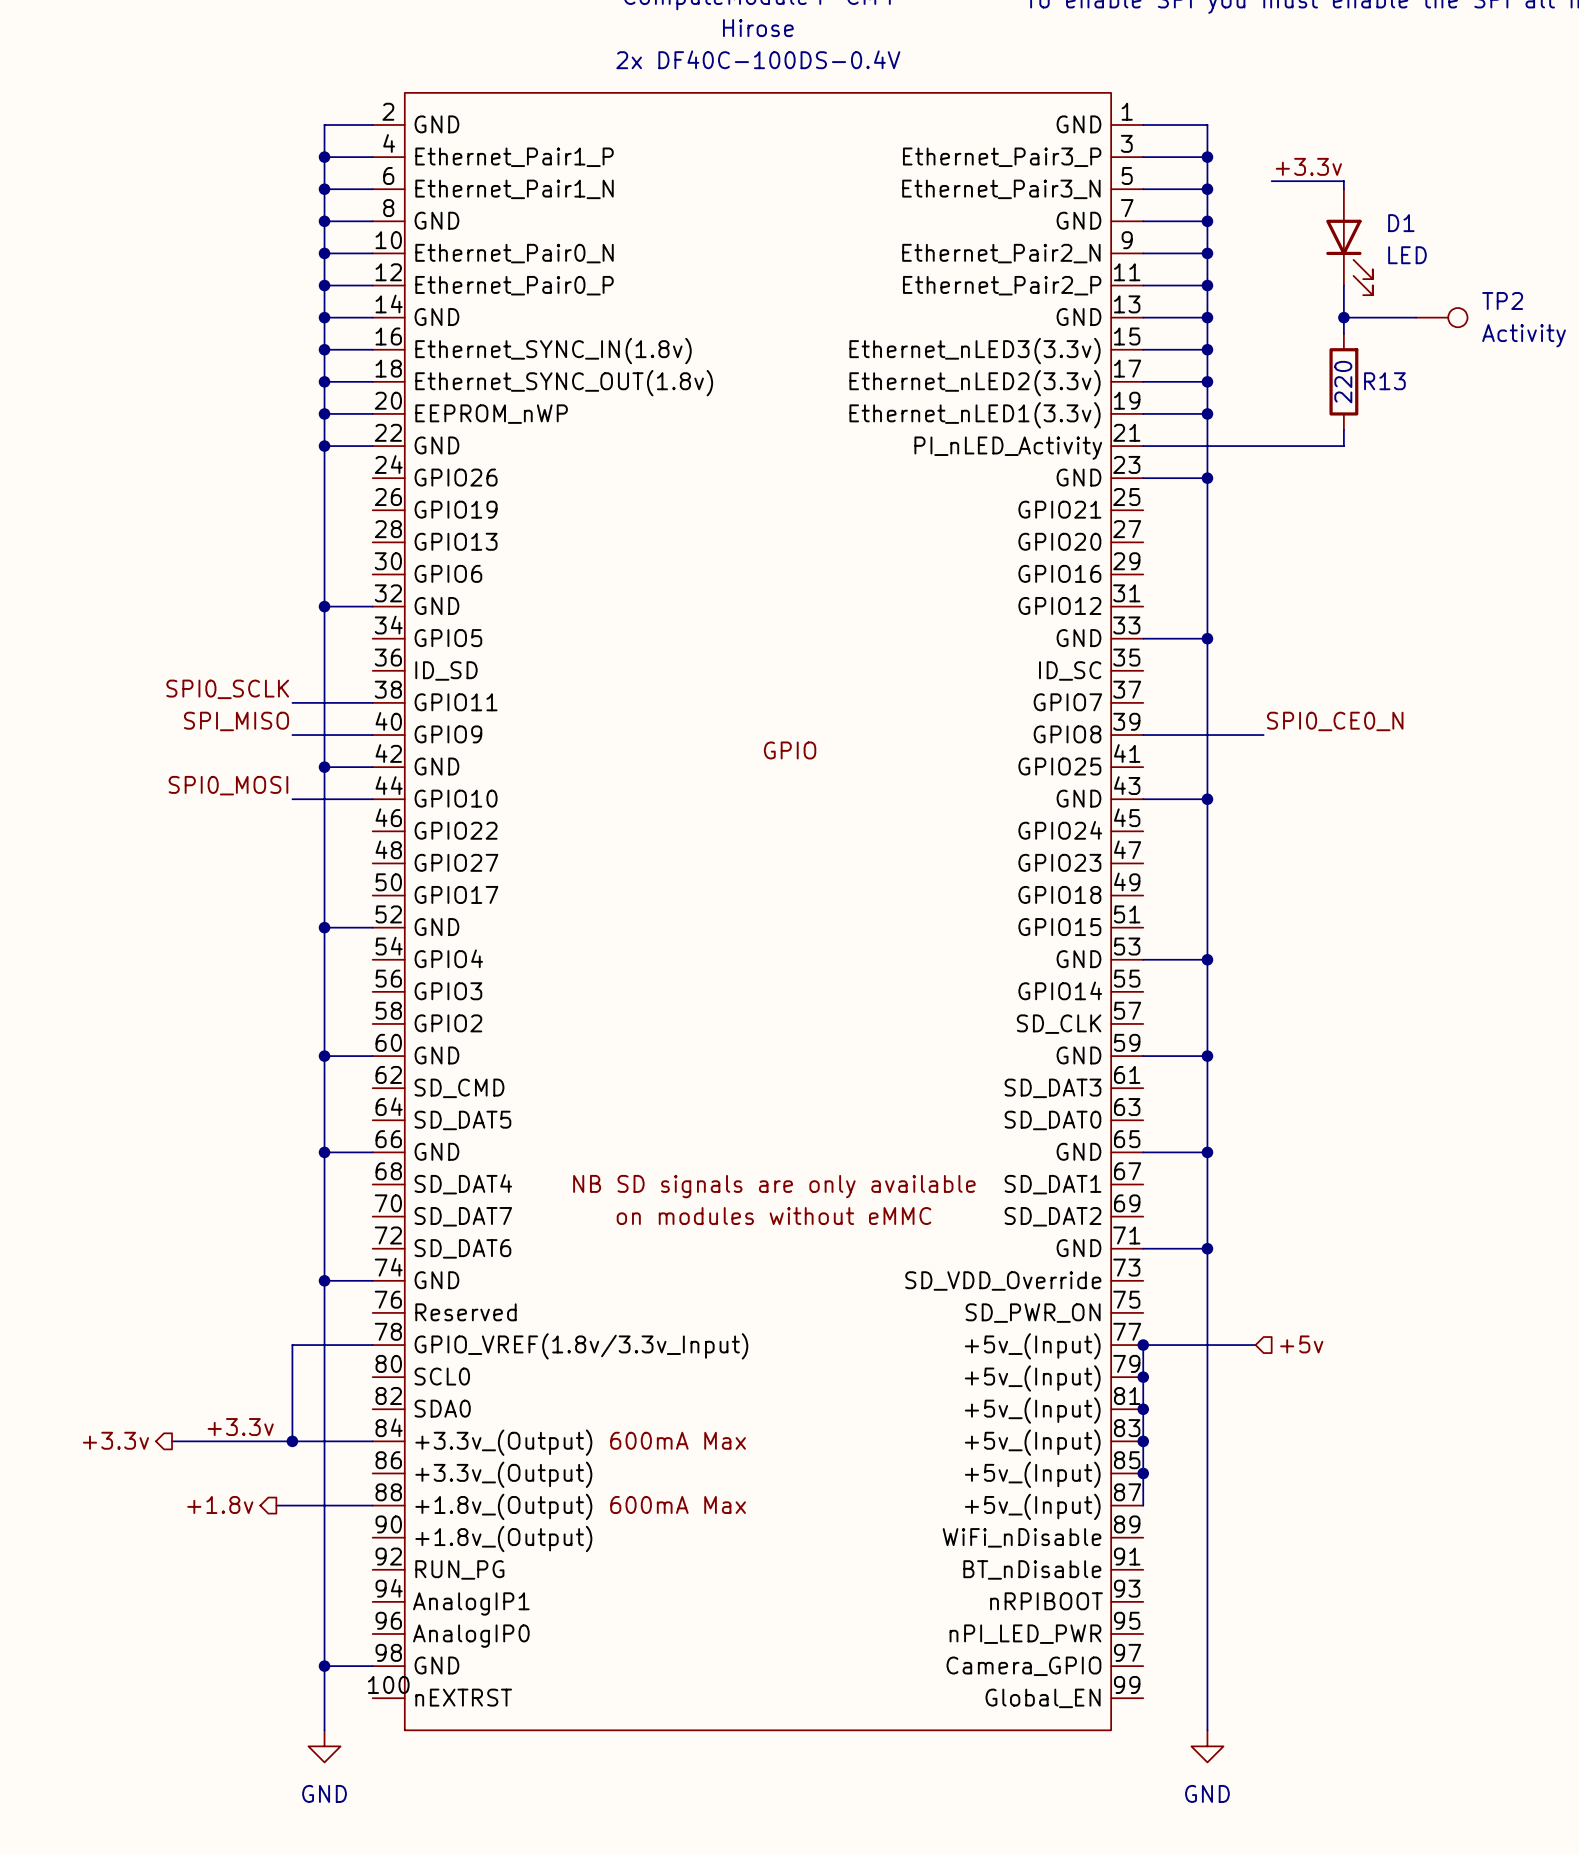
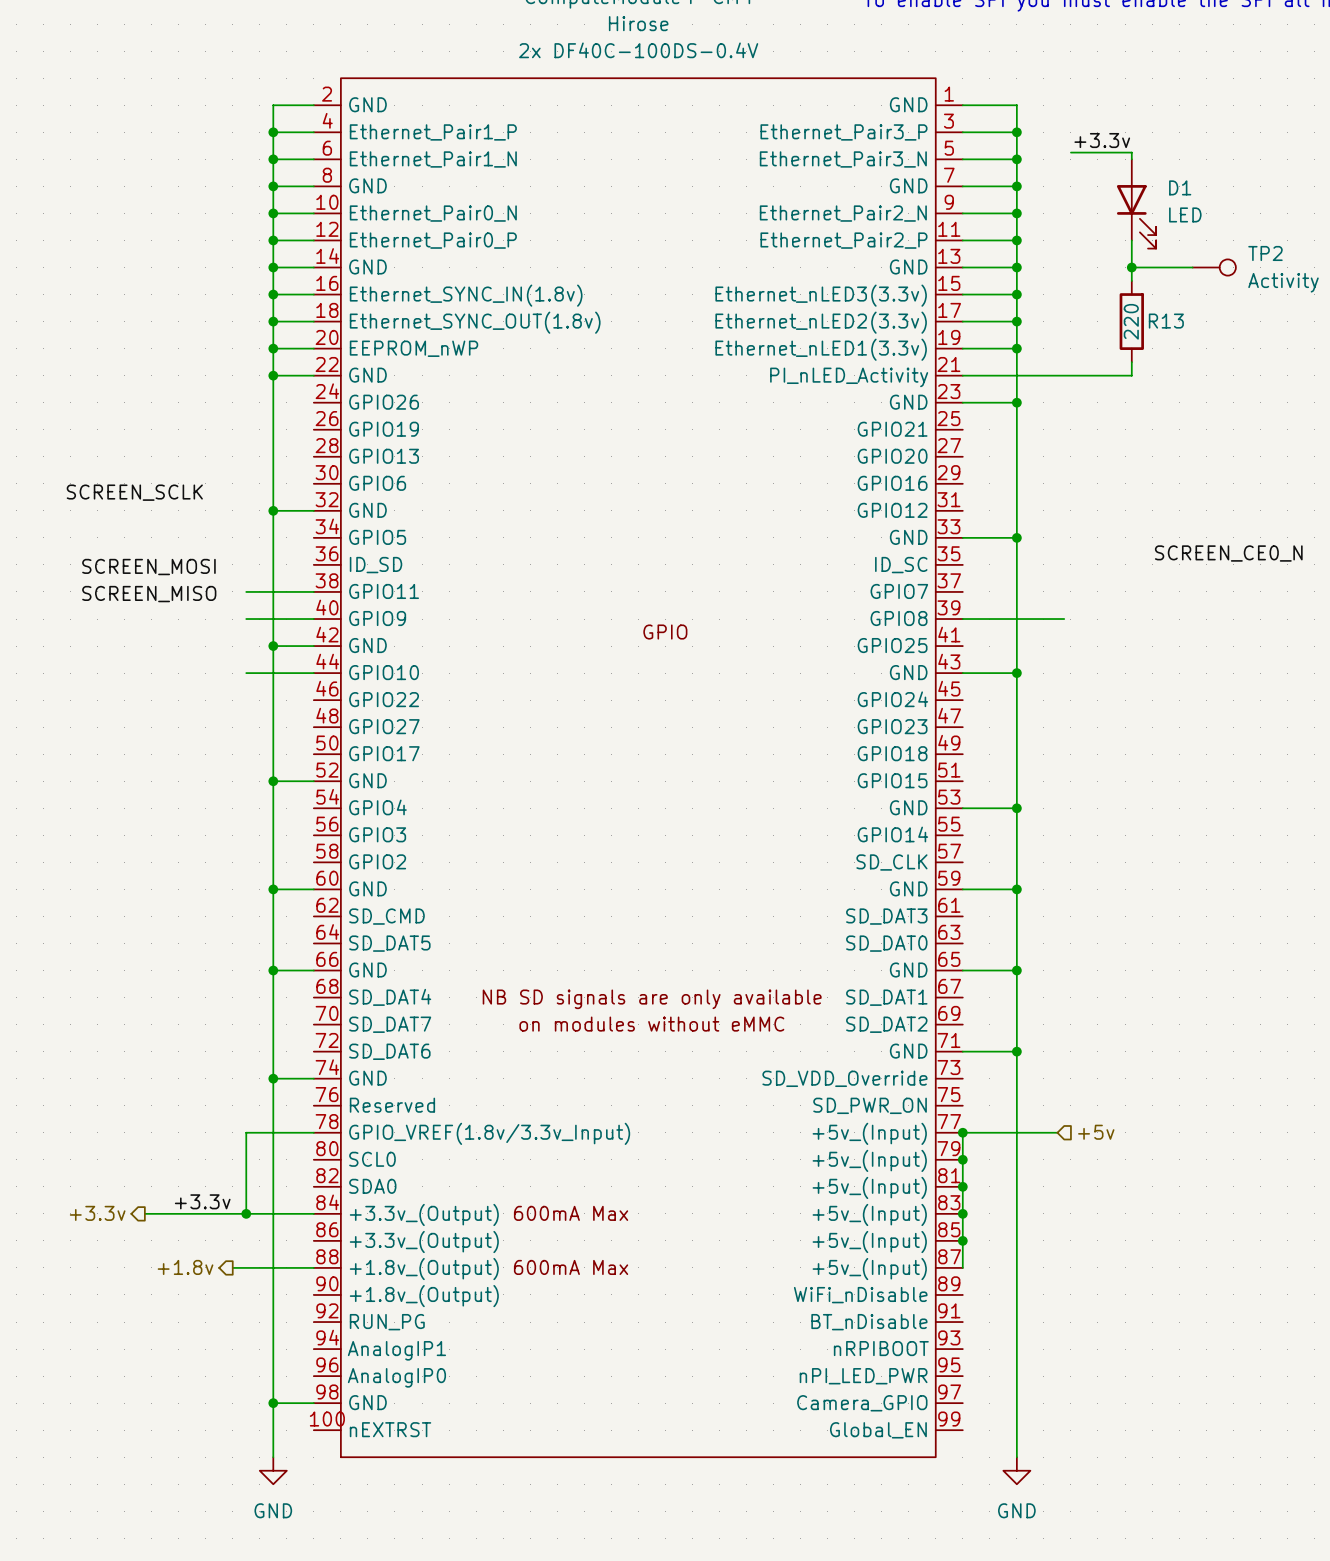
label: none -> SCREEN_SCLK (134, 492)
label: none -> SCREEN_CE0_N (1228, 553)
label: none -> SCREEN_MOSI (148, 567)
label: SPI0_SCLK (227, 689) -> none
label: SPI_MISO (236, 721) -> SCREEN_MISO (149, 594)
label: SPI0_CE0_N (1335, 721) -> none
label: SPI0_MOSI (228, 785) -> none

